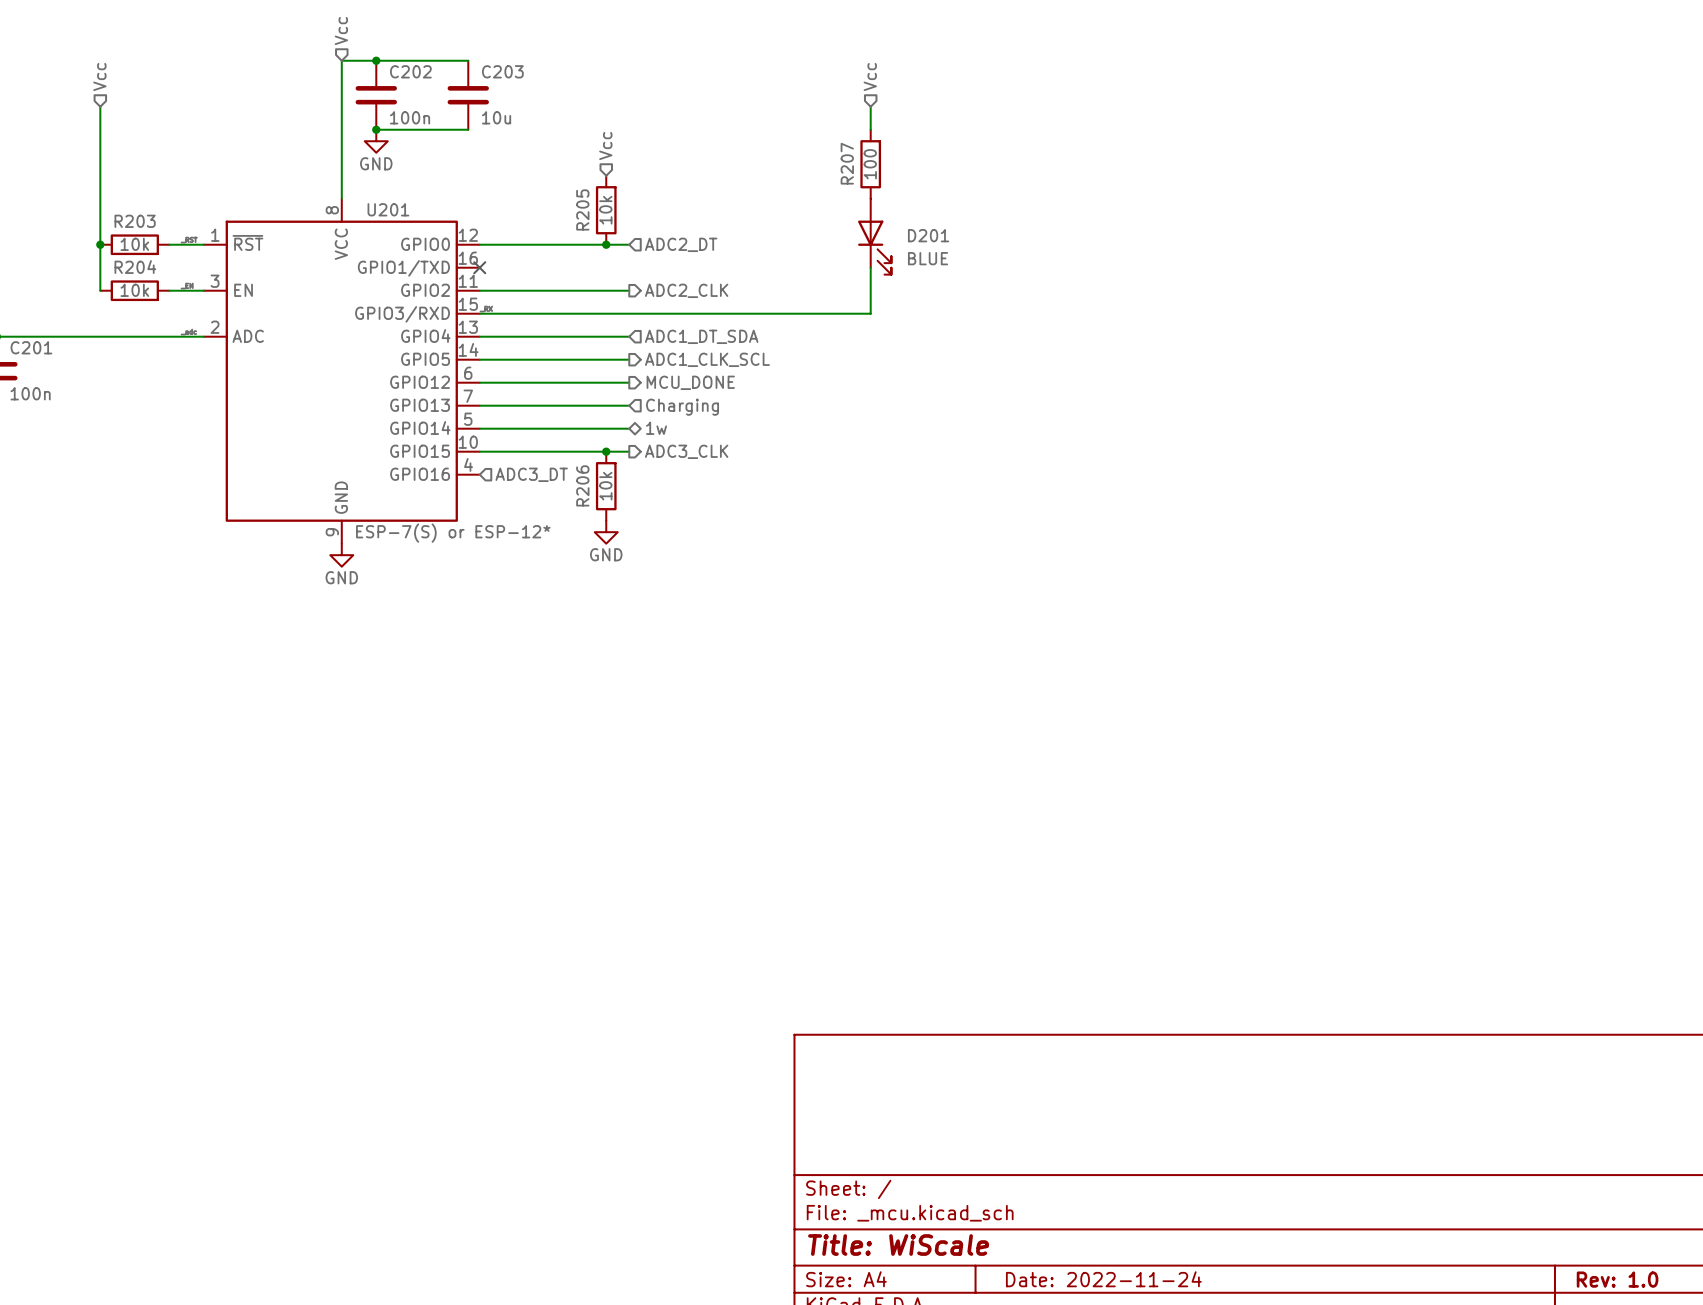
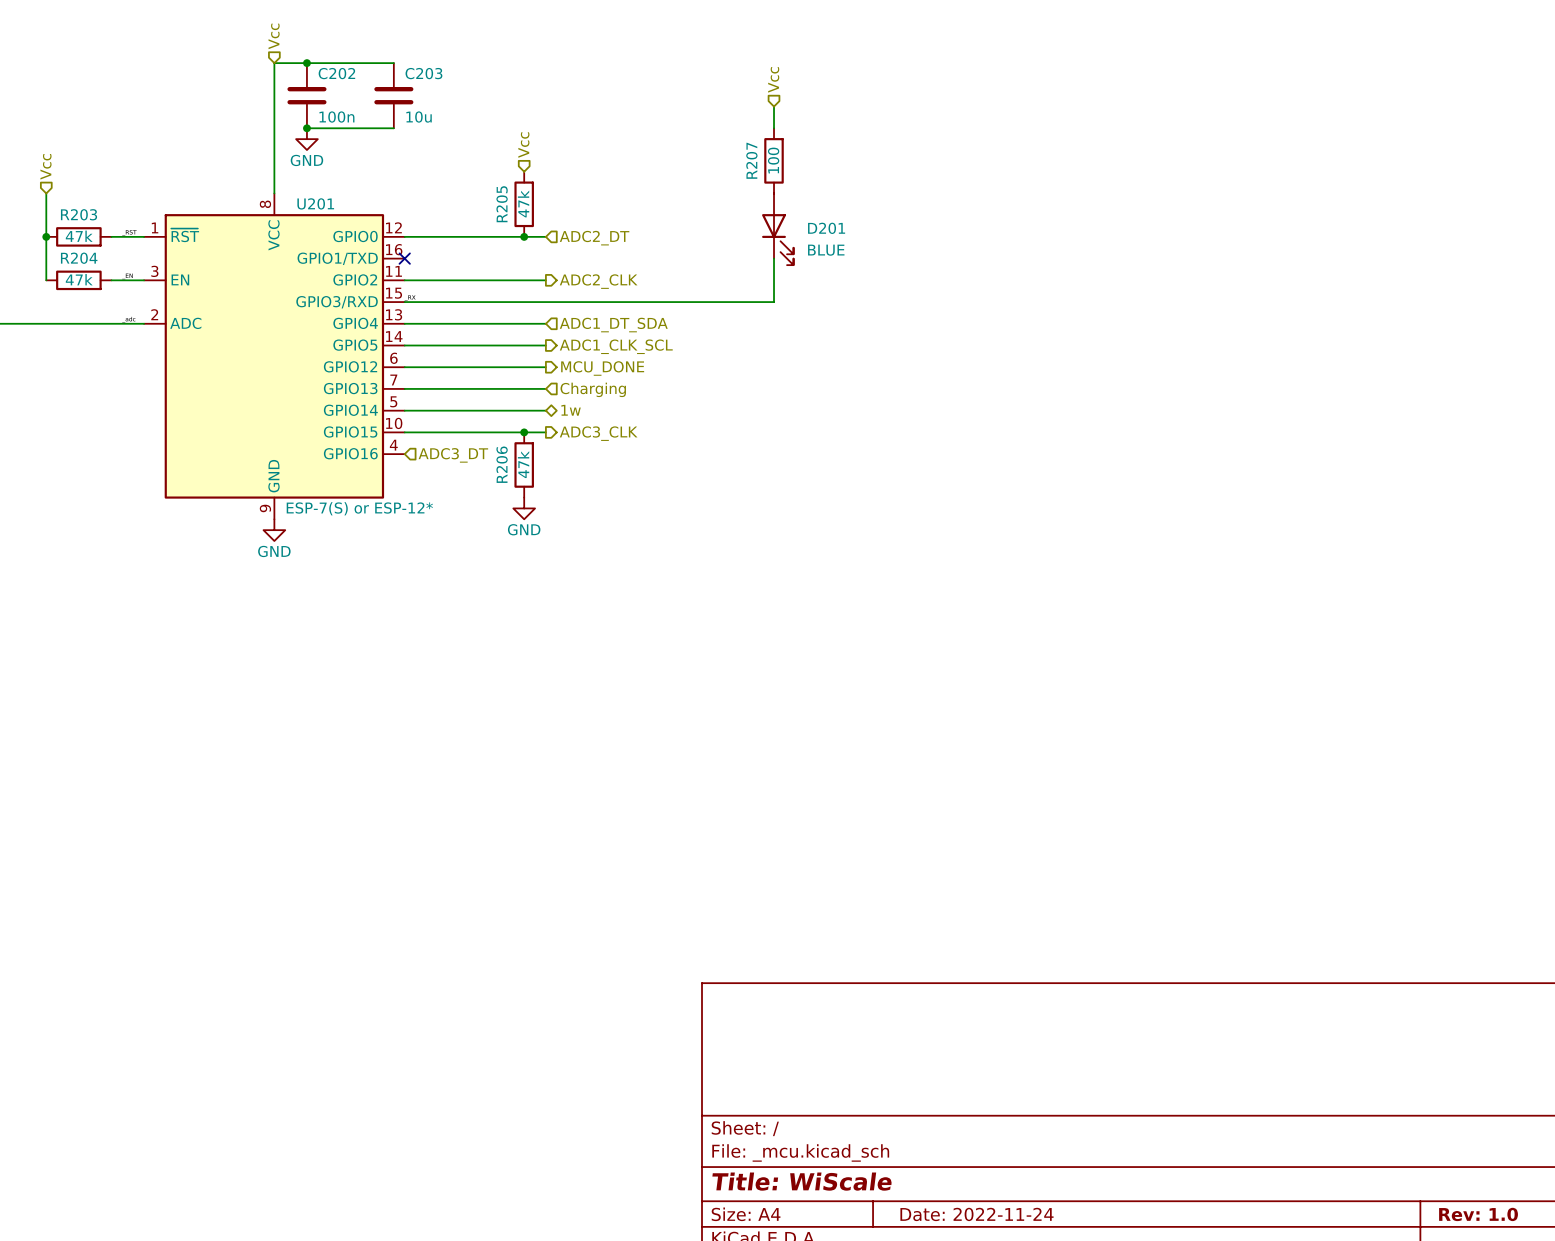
hierarchical label position: Vcc (99, 77) -> Vcc (45, 166)
wire: (100, 106) (100, 198) -> none
R205 value: 10k (605, 210) -> 47k (523, 203)
R203 value: 10k (134, 244) -> 47k (79, 236)
R204 value: 10k (134, 290) -> 47k (79, 279)
R206 value: 10k (605, 486) -> 47k (523, 464)

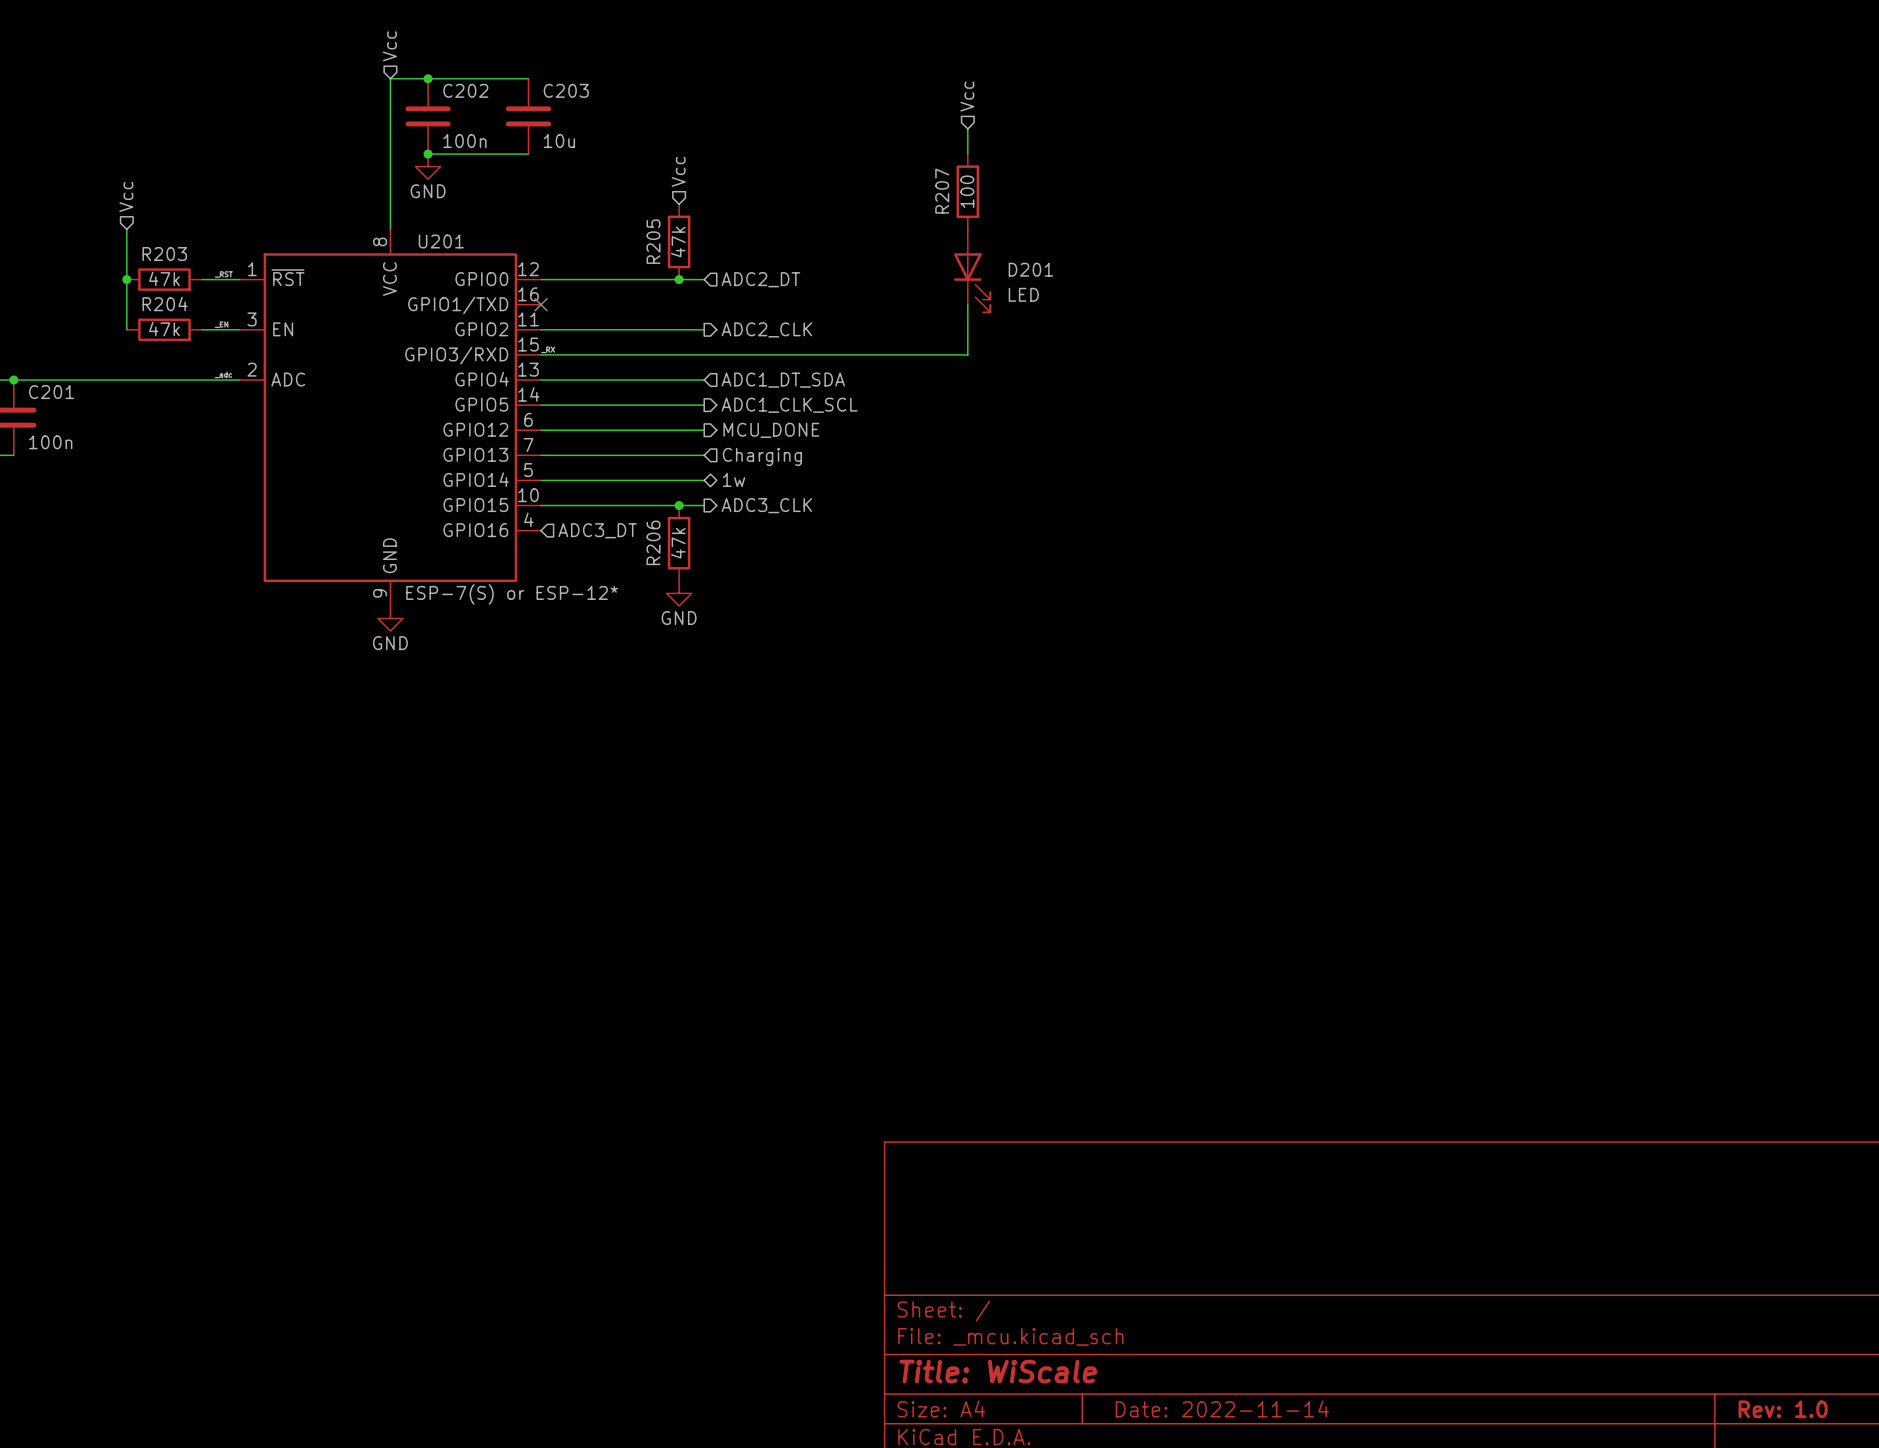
D201 value: BLUE (826, 250) -> LED (1023, 294)
title block: Date: 2022-11-24 (976, 1214) -> Date: 2022-11-14 (1222, 1408)

